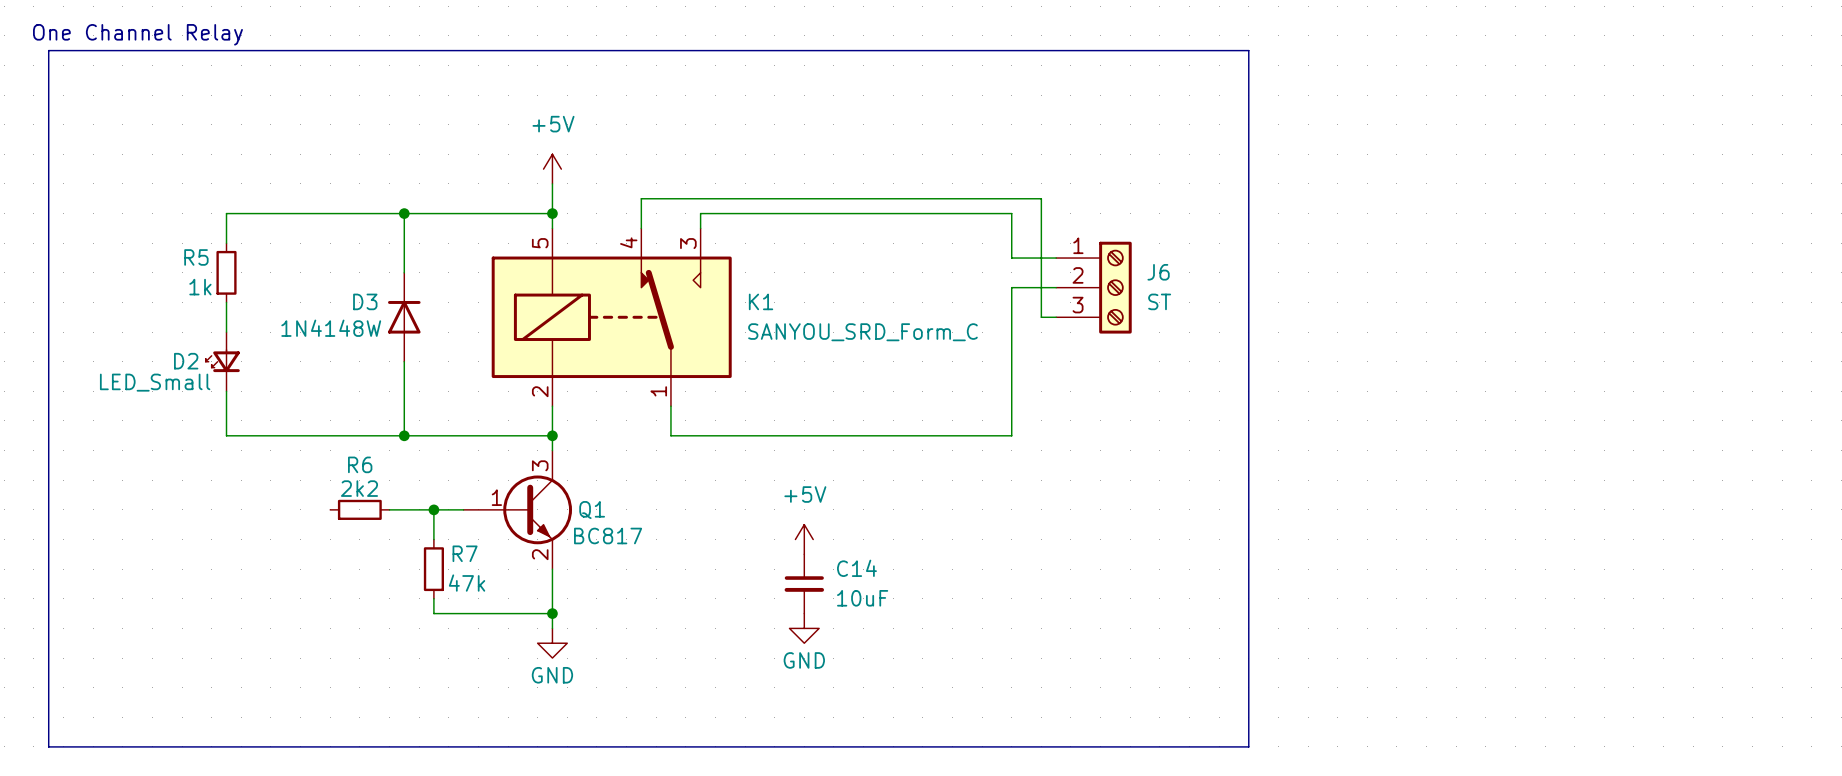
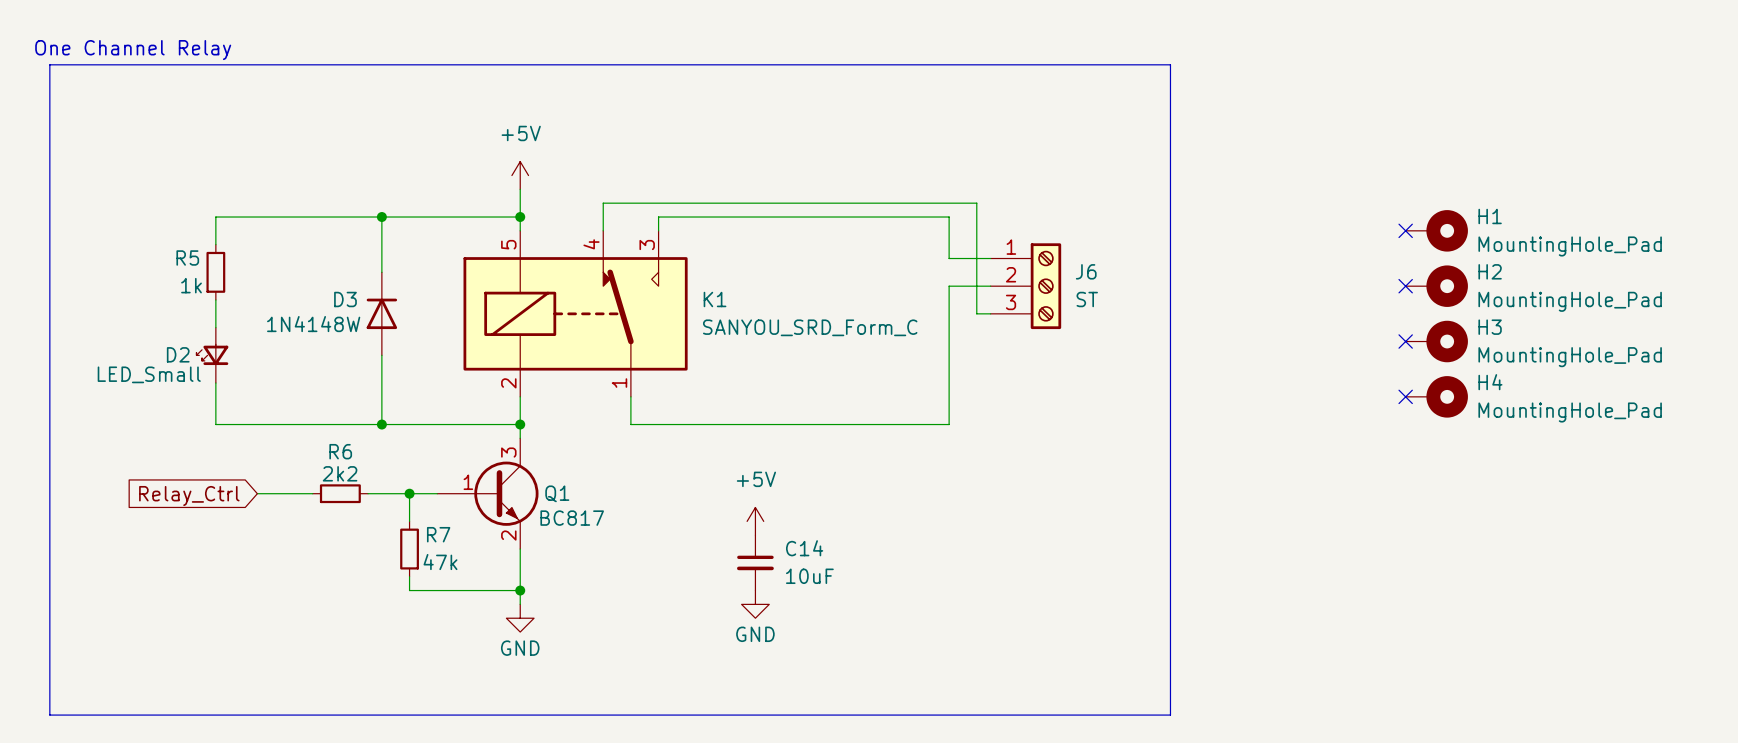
no-connect mark: none -> (1405, 230)
H1: none -> MountingHole_Pad (1436, 230)
no-connect mark: none -> (1405, 286)
H2: none -> MountingHole_Pad (1436, 286)
no-connect mark: none -> (1405, 341)
H3: none -> MountingHole_Pad (1436, 341)
no-connect mark: none -> (1405, 396)
H4: none -> MountingHole_Pad (1436, 396)
wire: none -> (257, 493) (312, 493)
global label: none -> Relay_Ctrl (189, 496)

